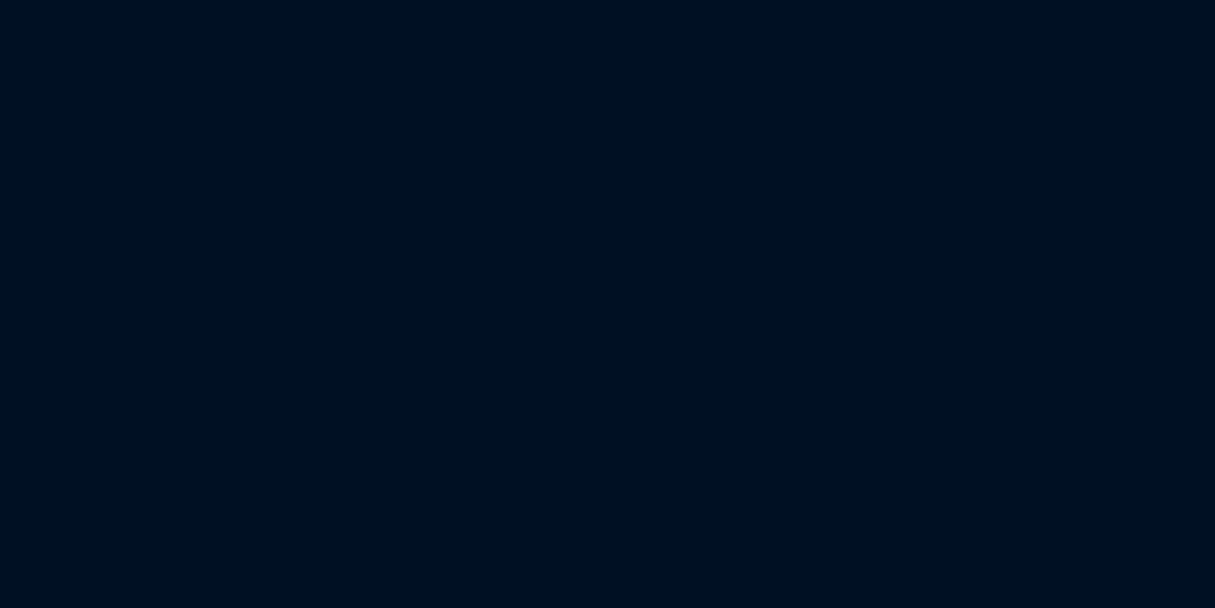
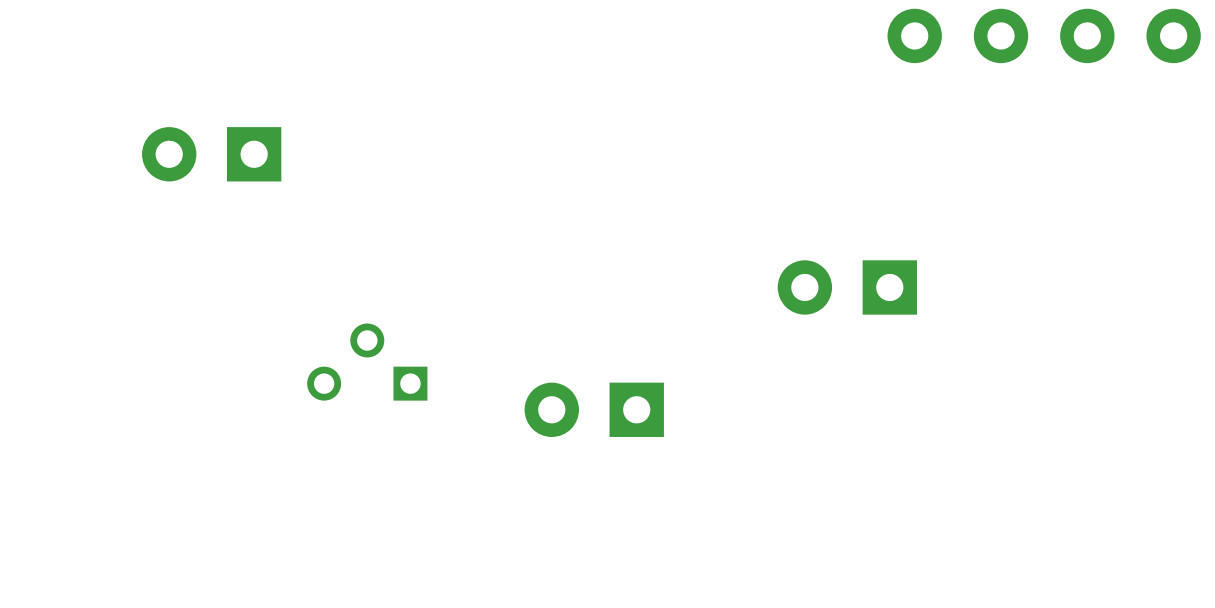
part: none -> (1044, 35)
part: none -> (211, 154)
part: none -> (847, 287)
part: none -> (367, 362)
part: none -> (594, 409)

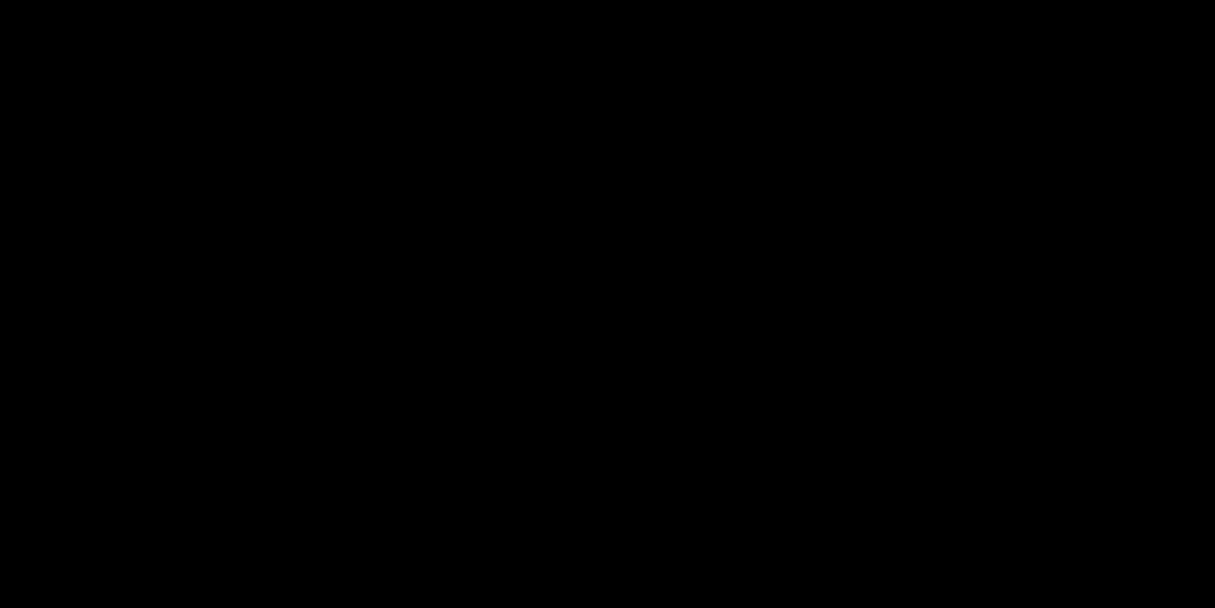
part: (1044, 35) -> none
part: (211, 154) -> none
part: (847, 287) -> none
part: (367, 362) -> none
part: (594, 409) -> none

